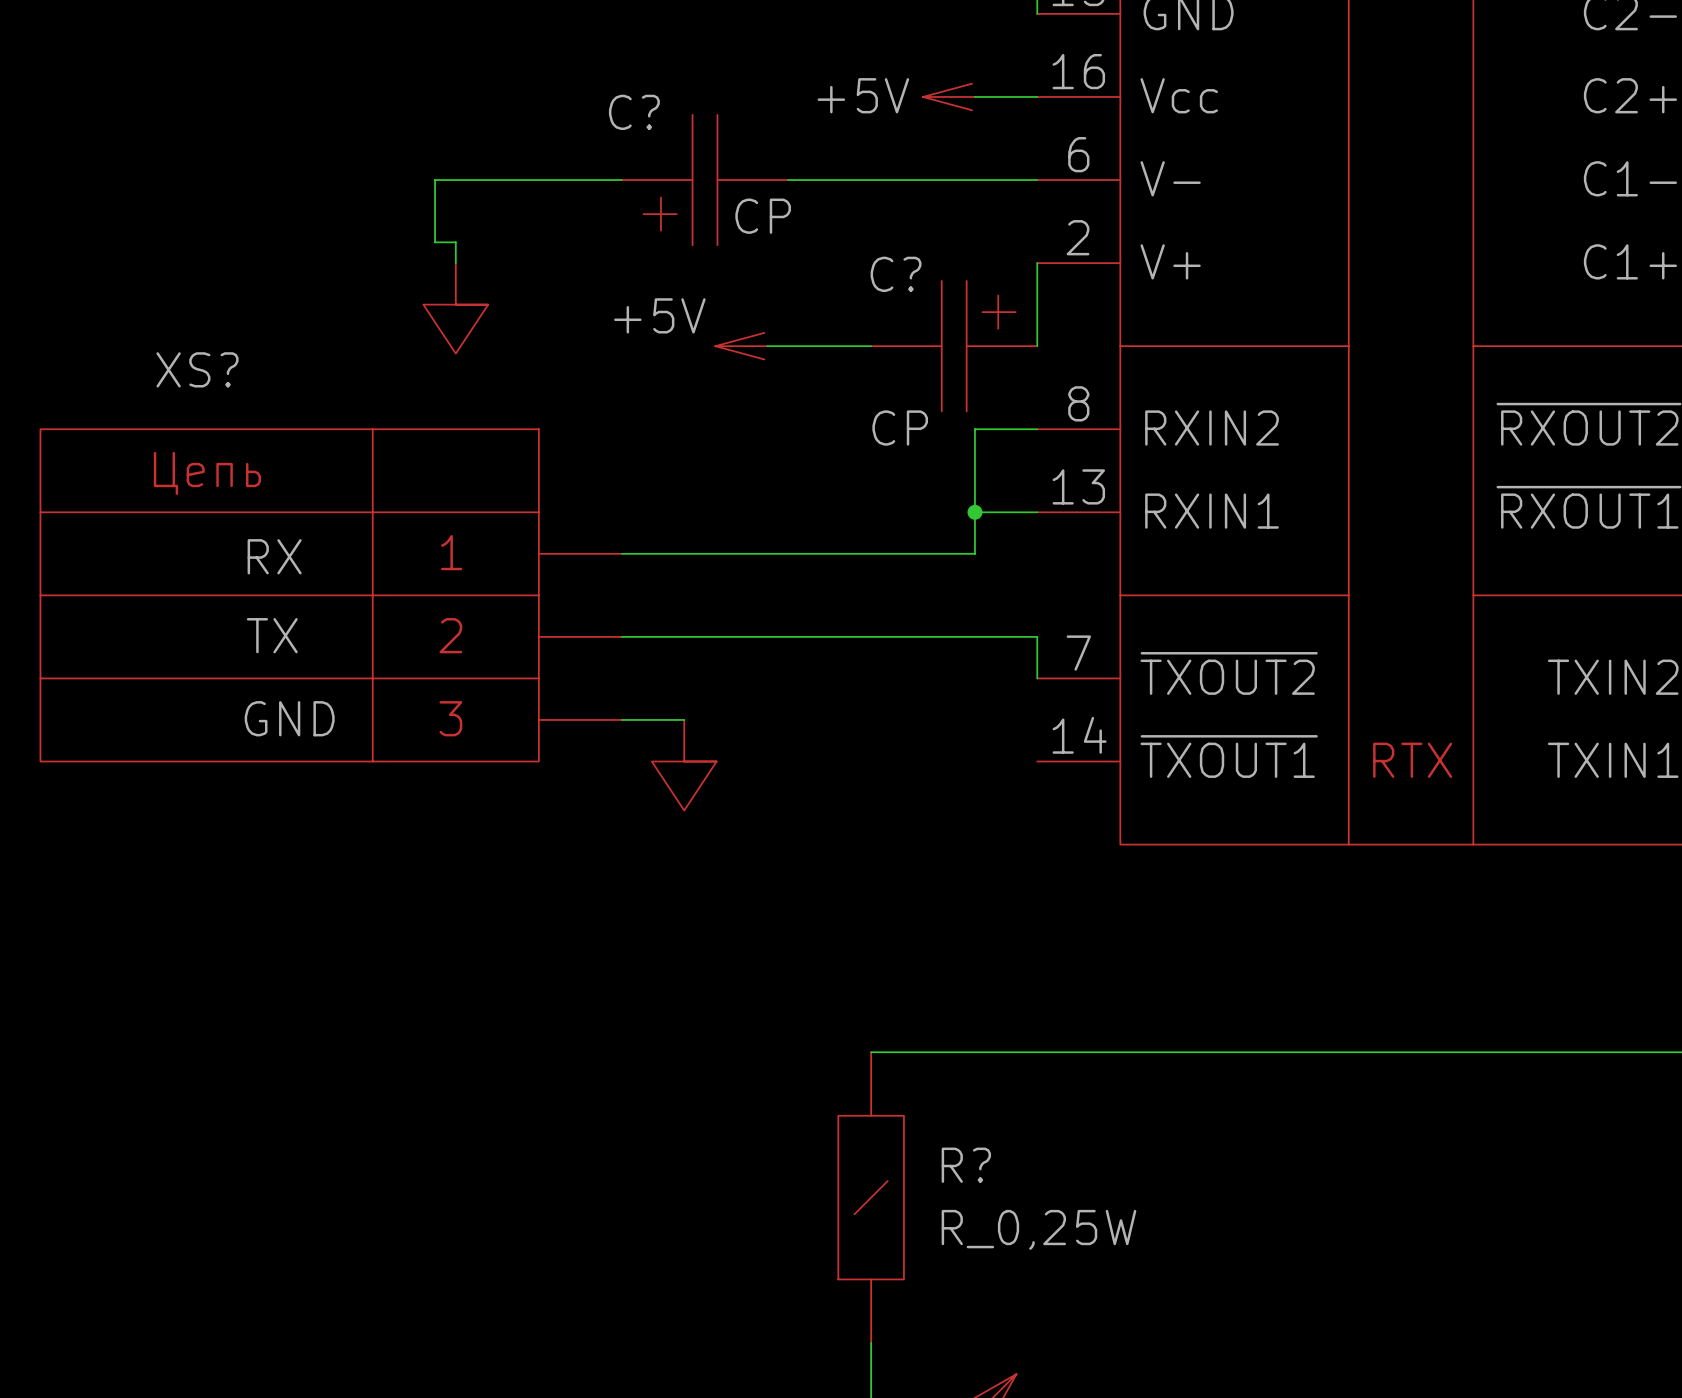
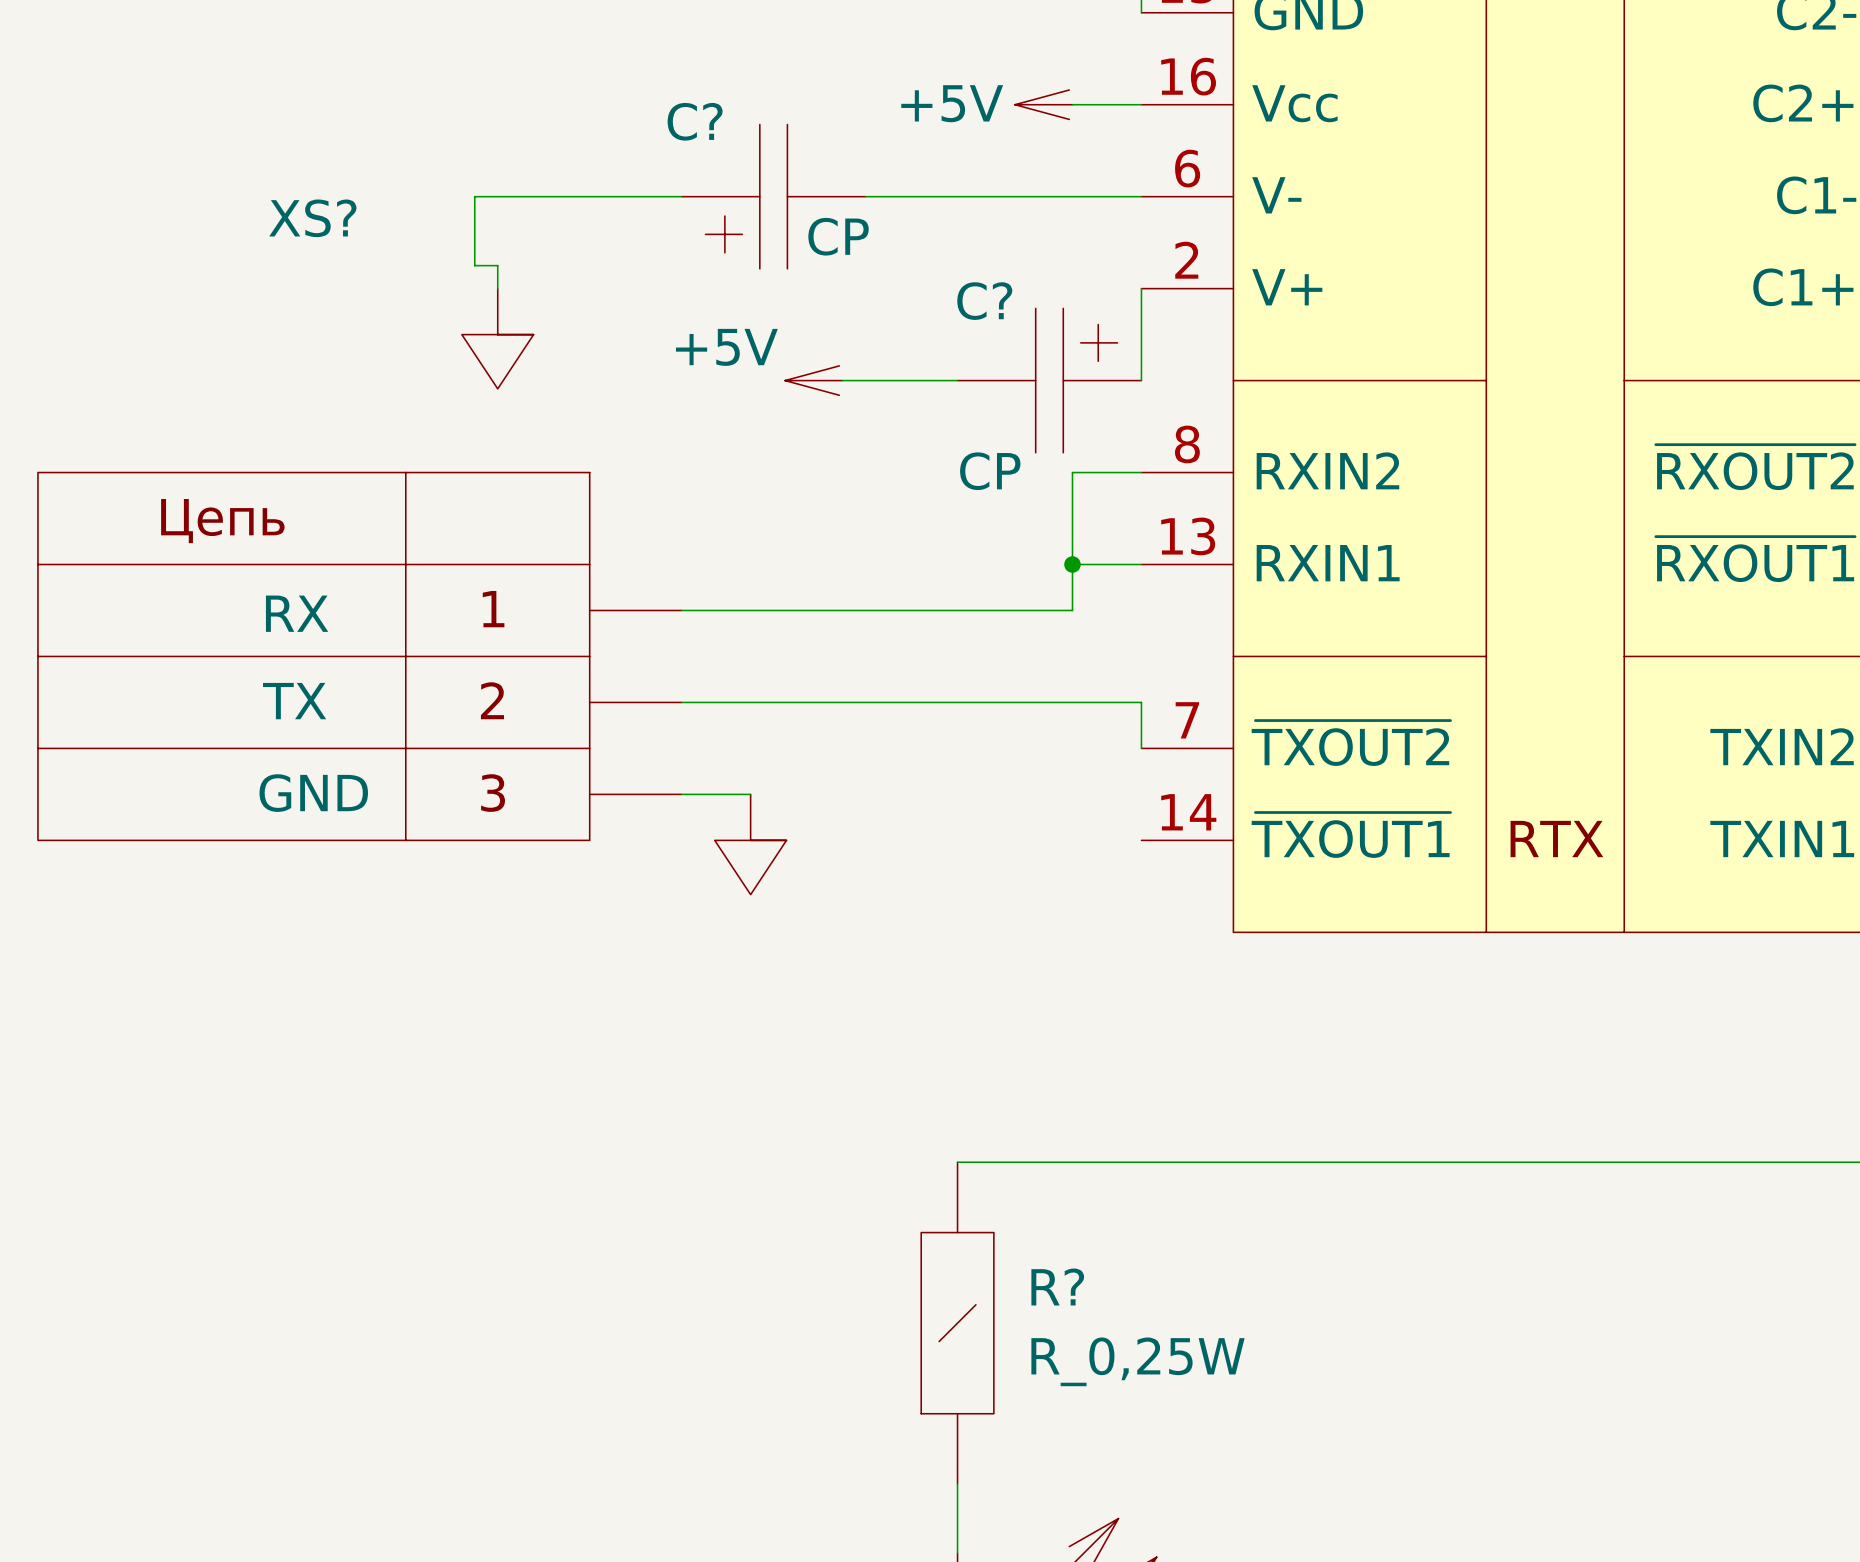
XS? name position: XS? (197, 369) -> XS? (312, 218)

